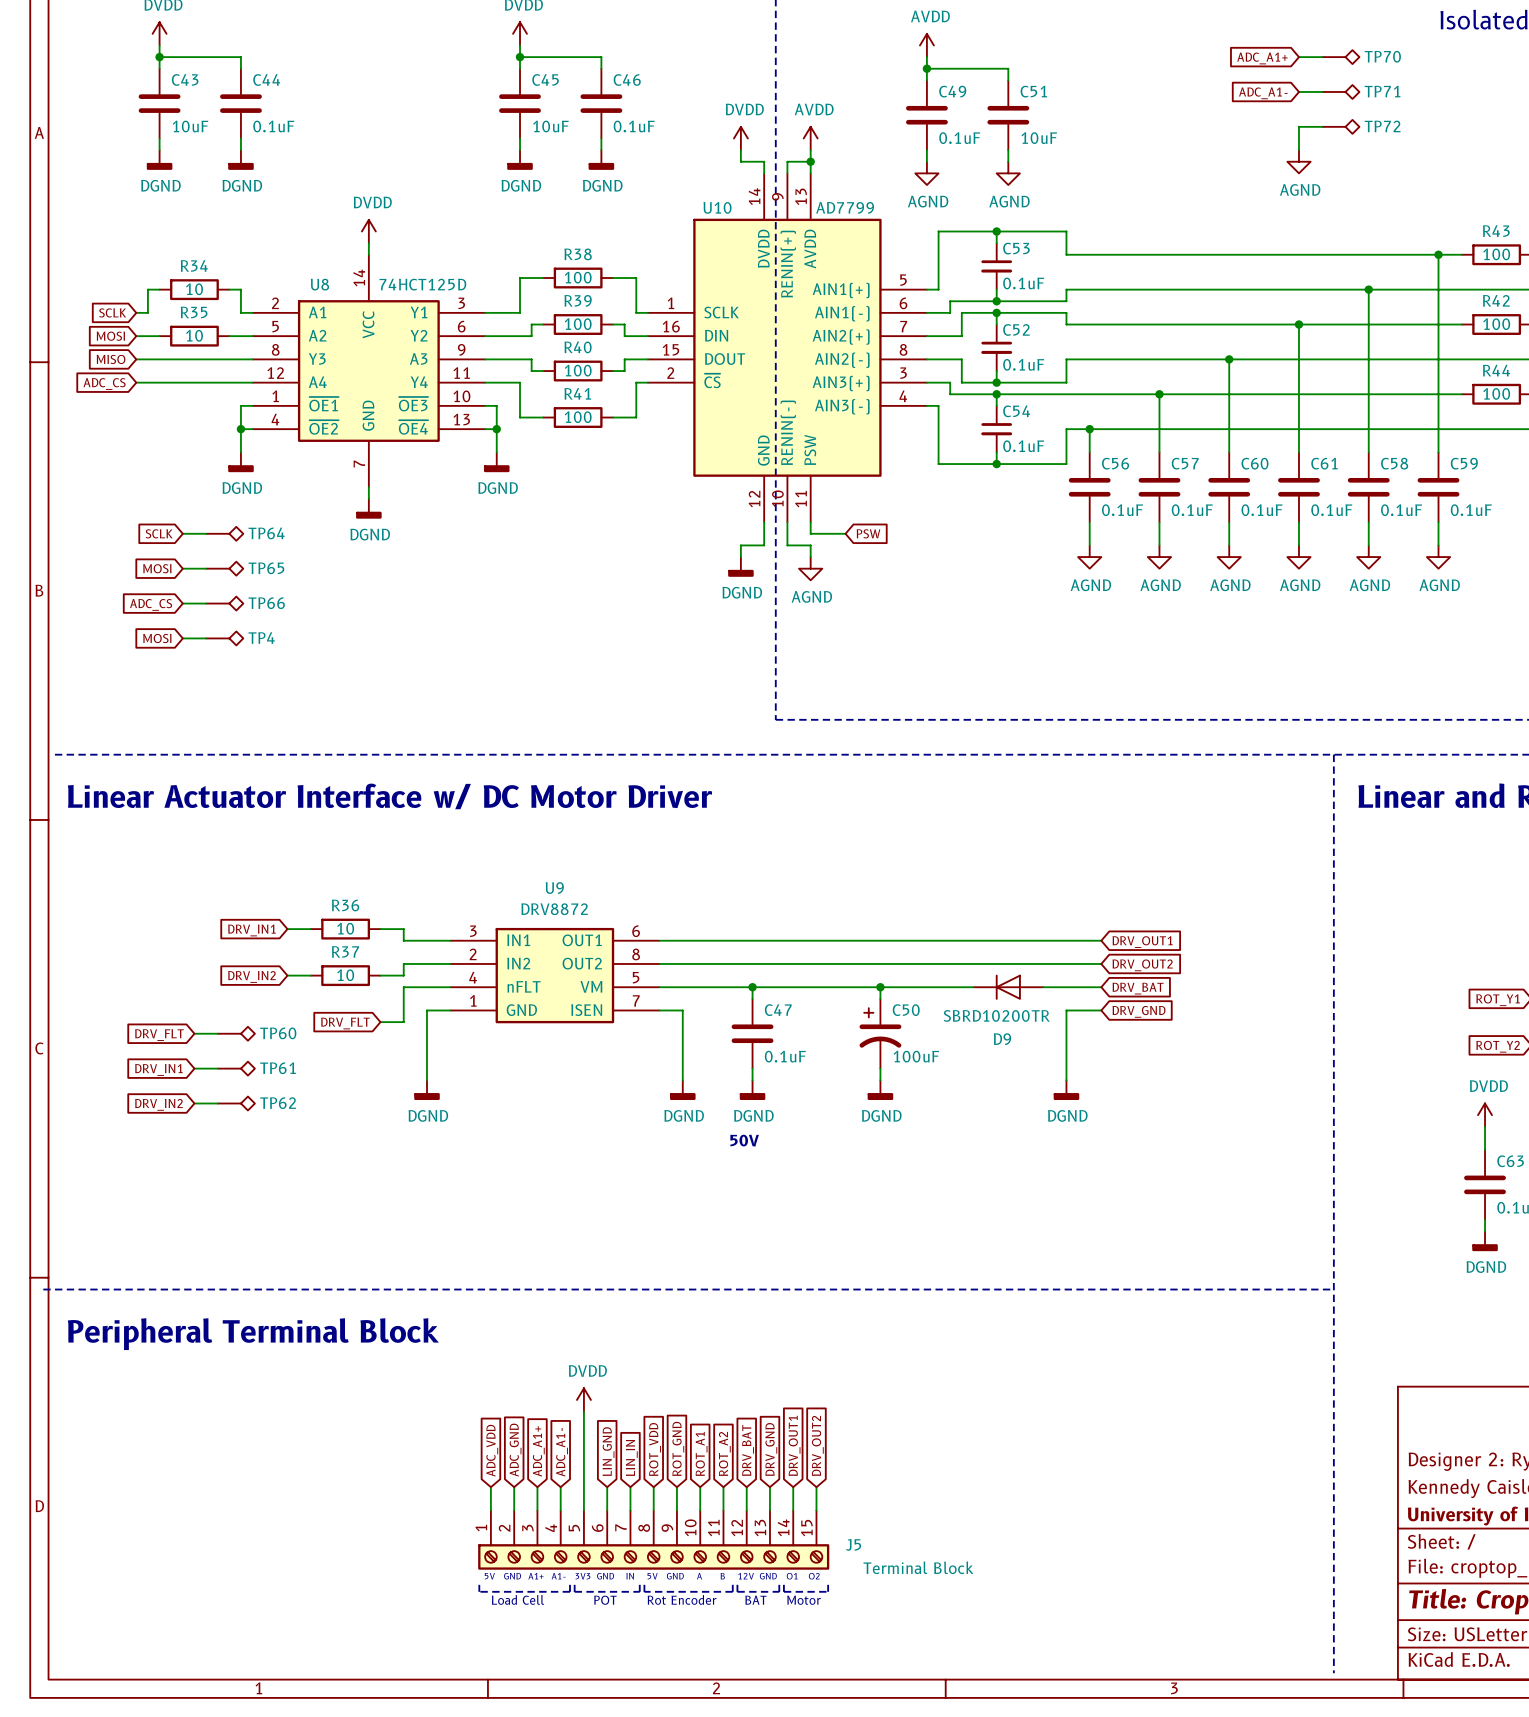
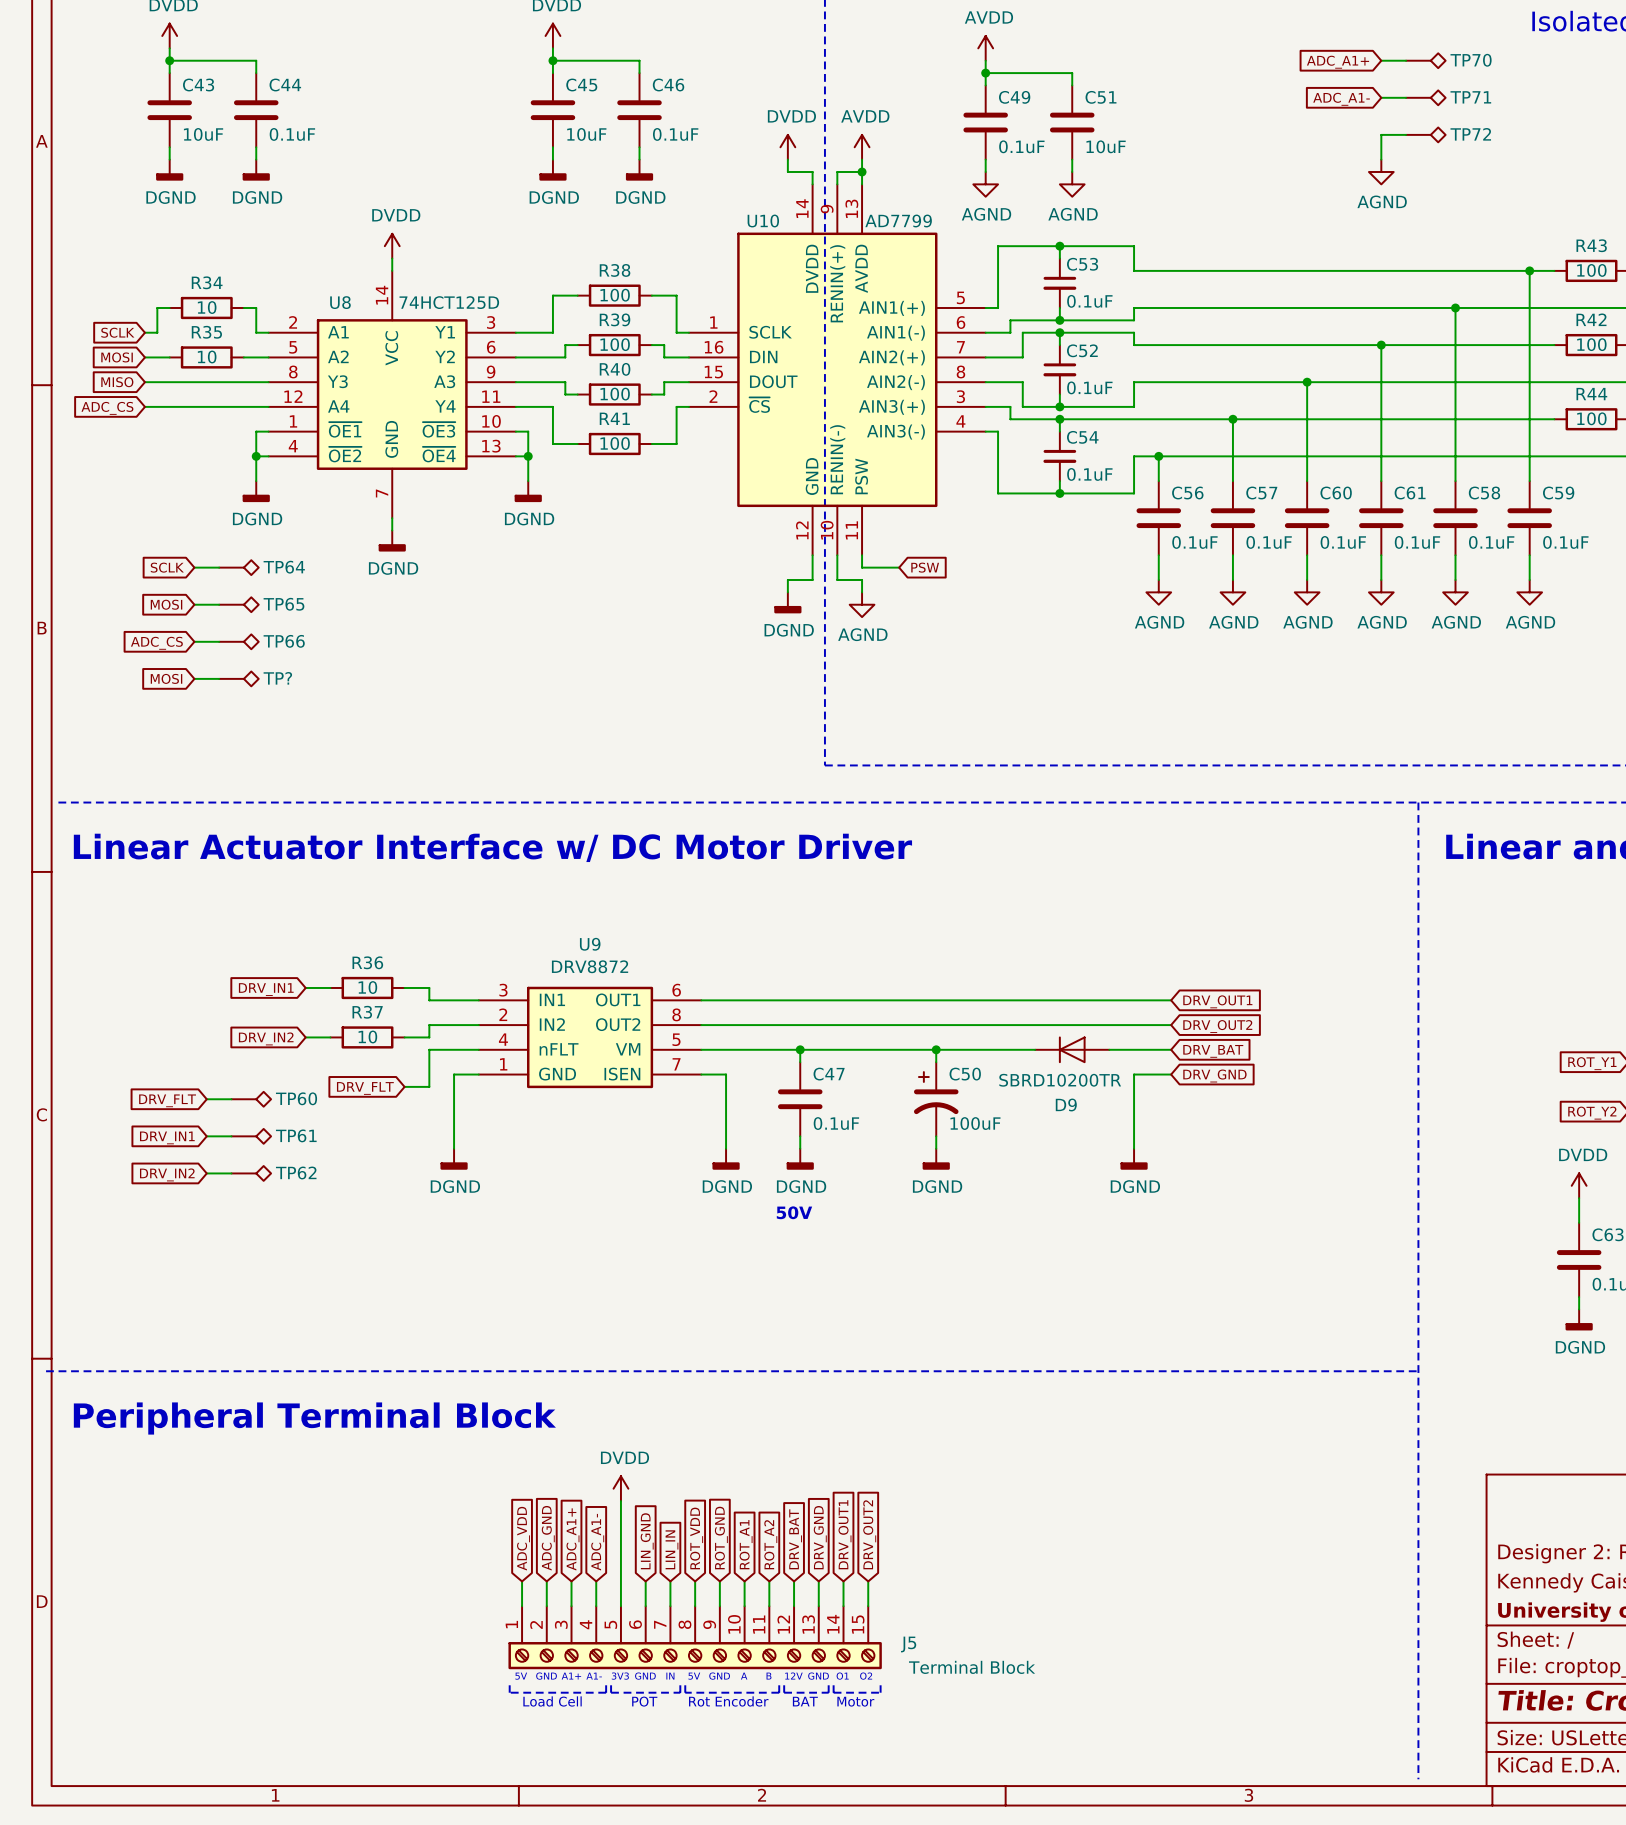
TP4 name: TP4 (261, 638) -> TP? (277, 678)

